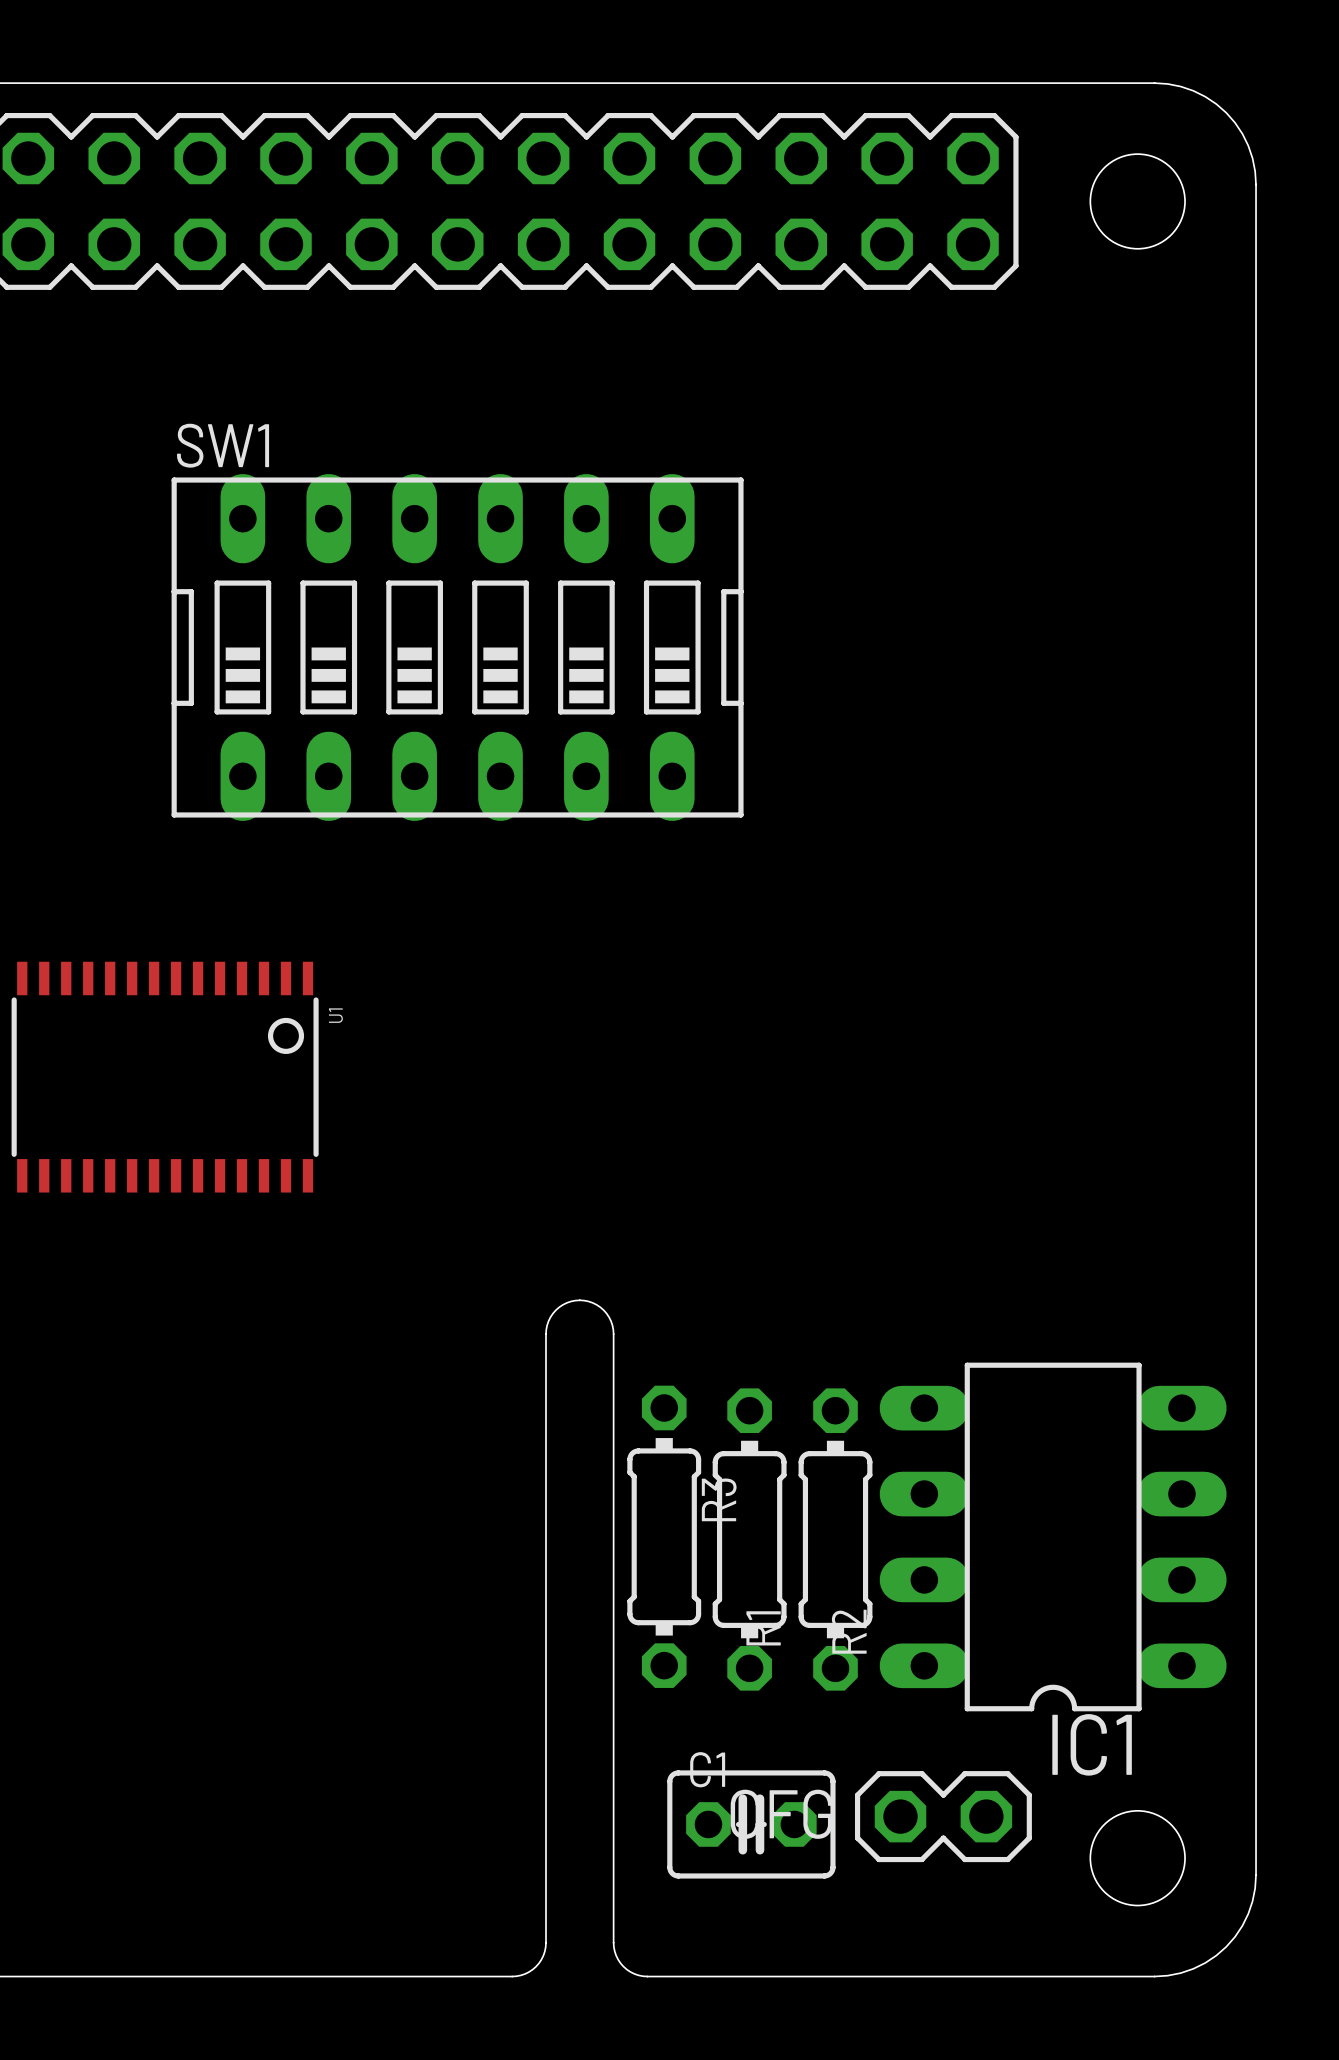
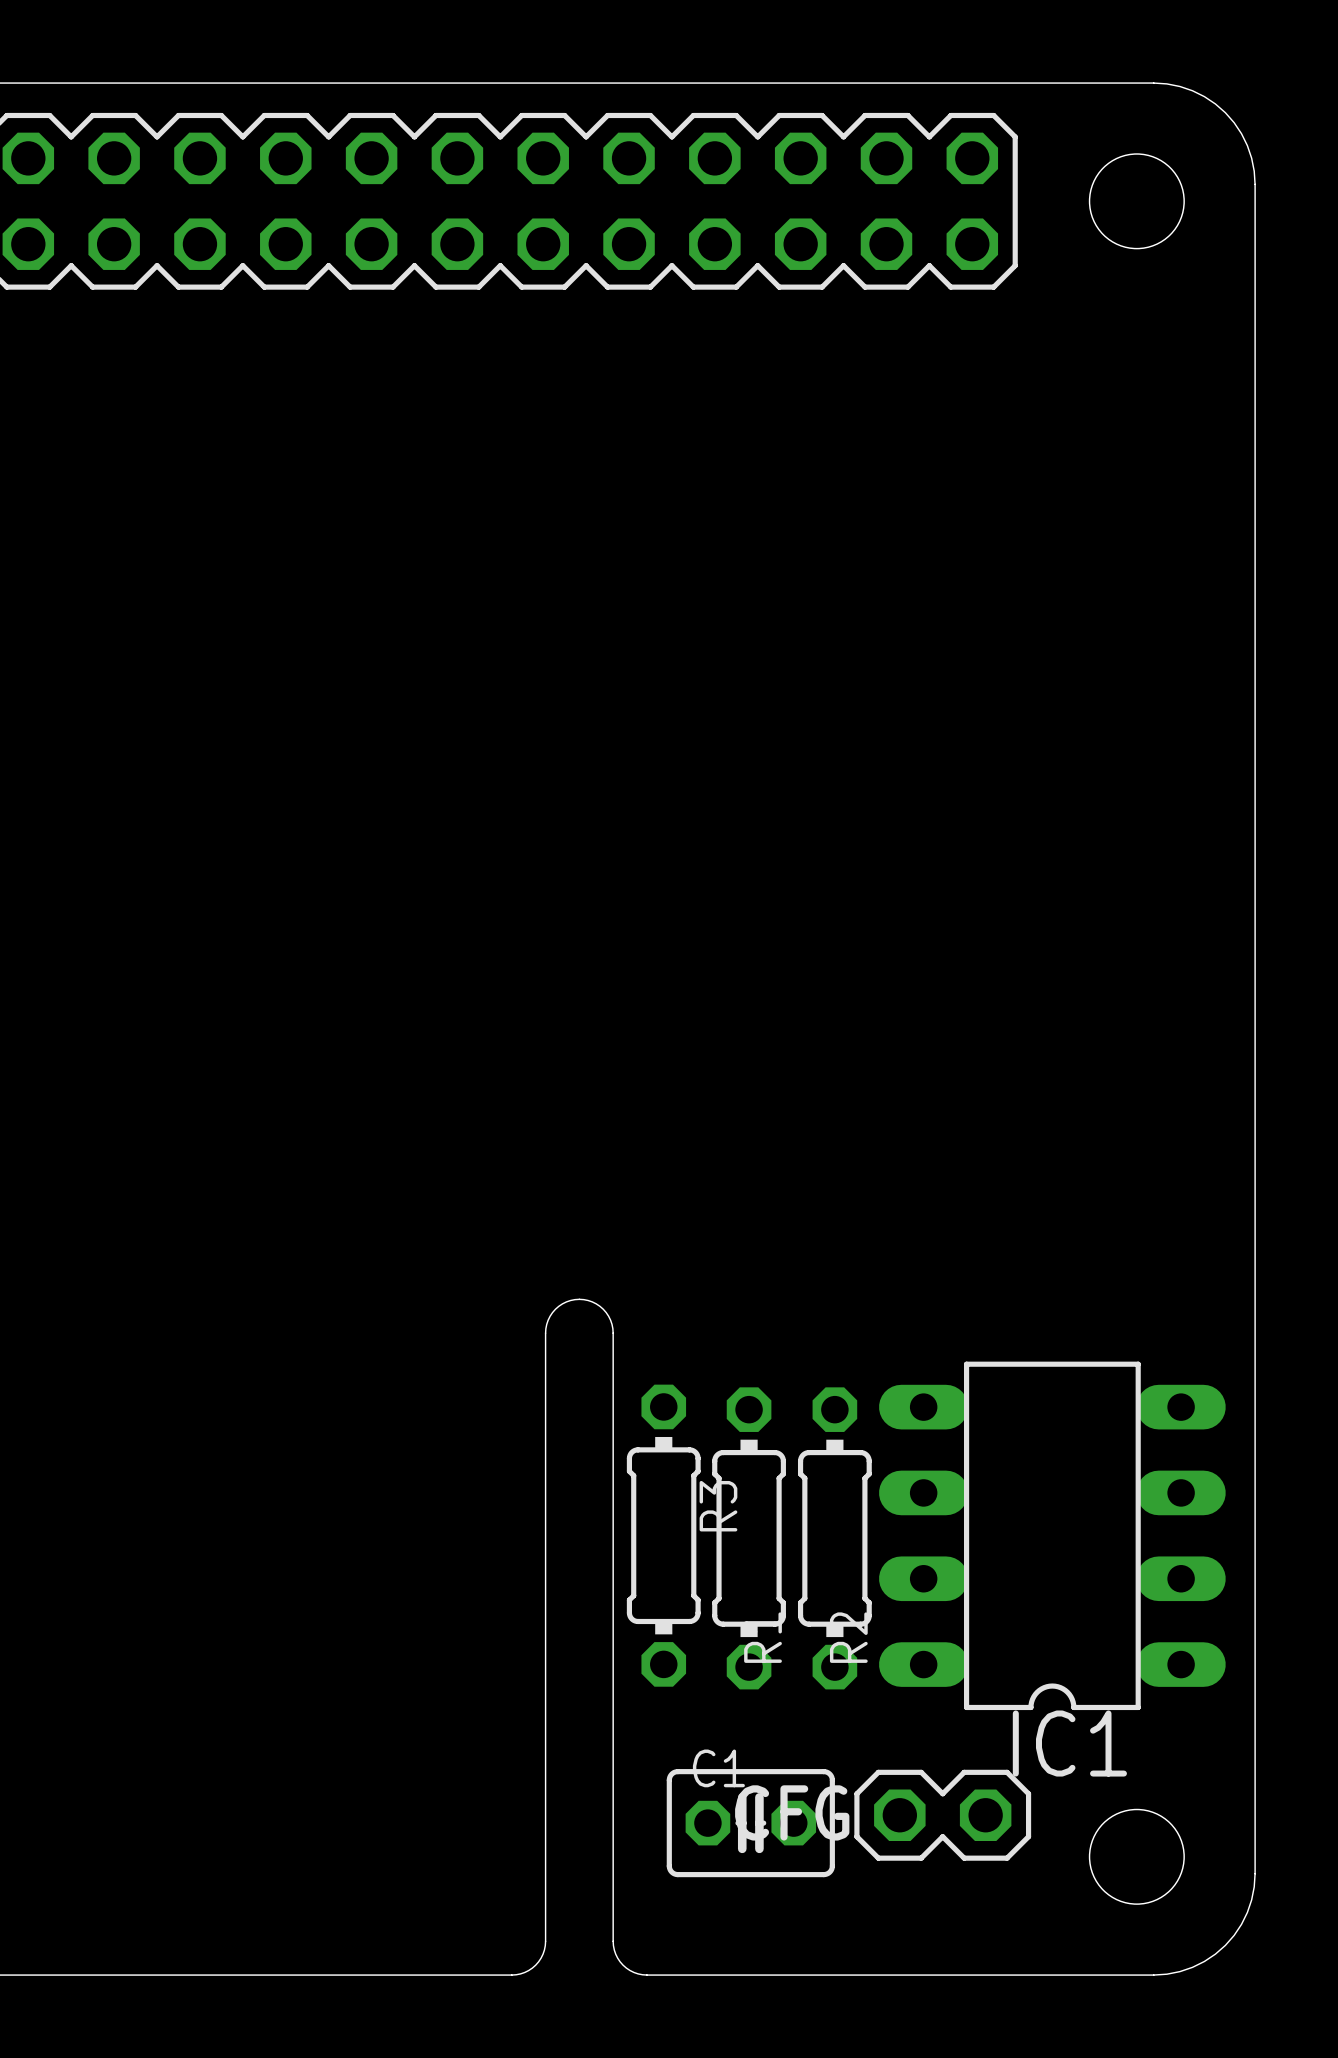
SW1: (457, 647) -> none
U1: (165, 1077) -> none

